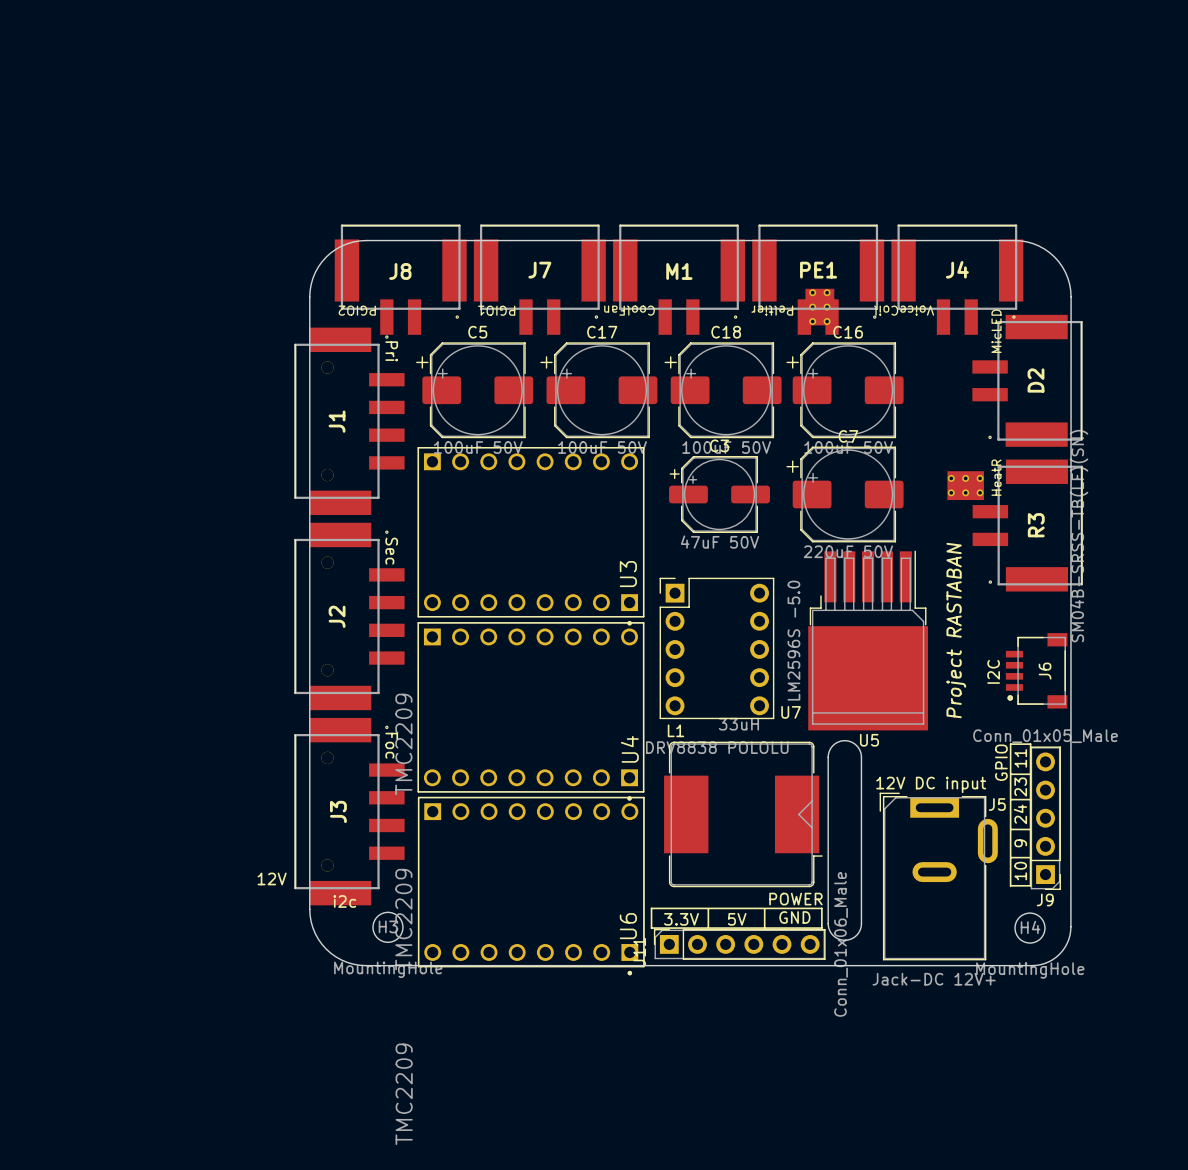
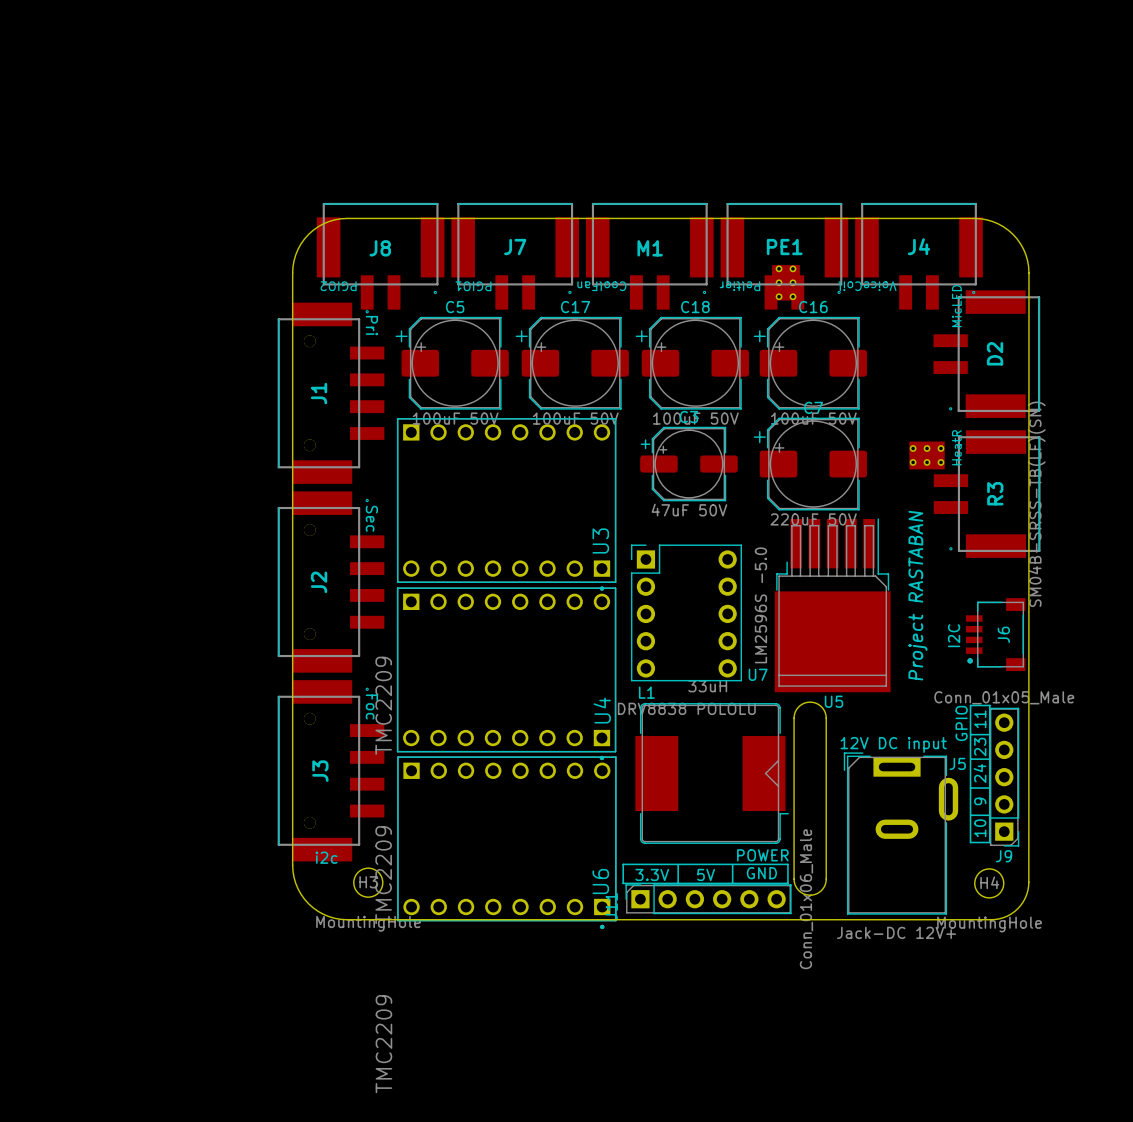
text: 12V (272, 878) -> none

